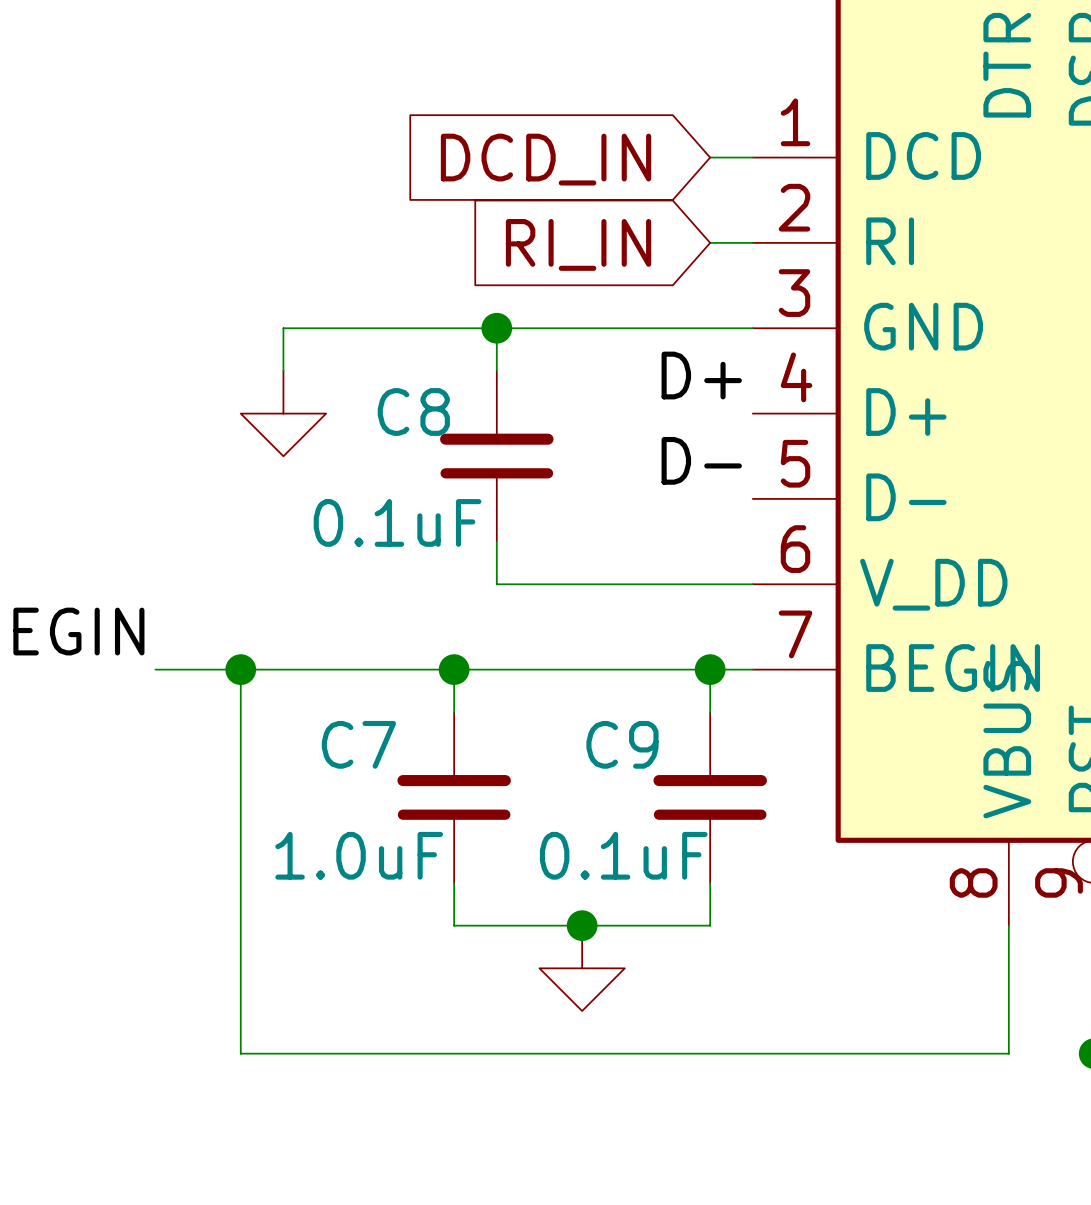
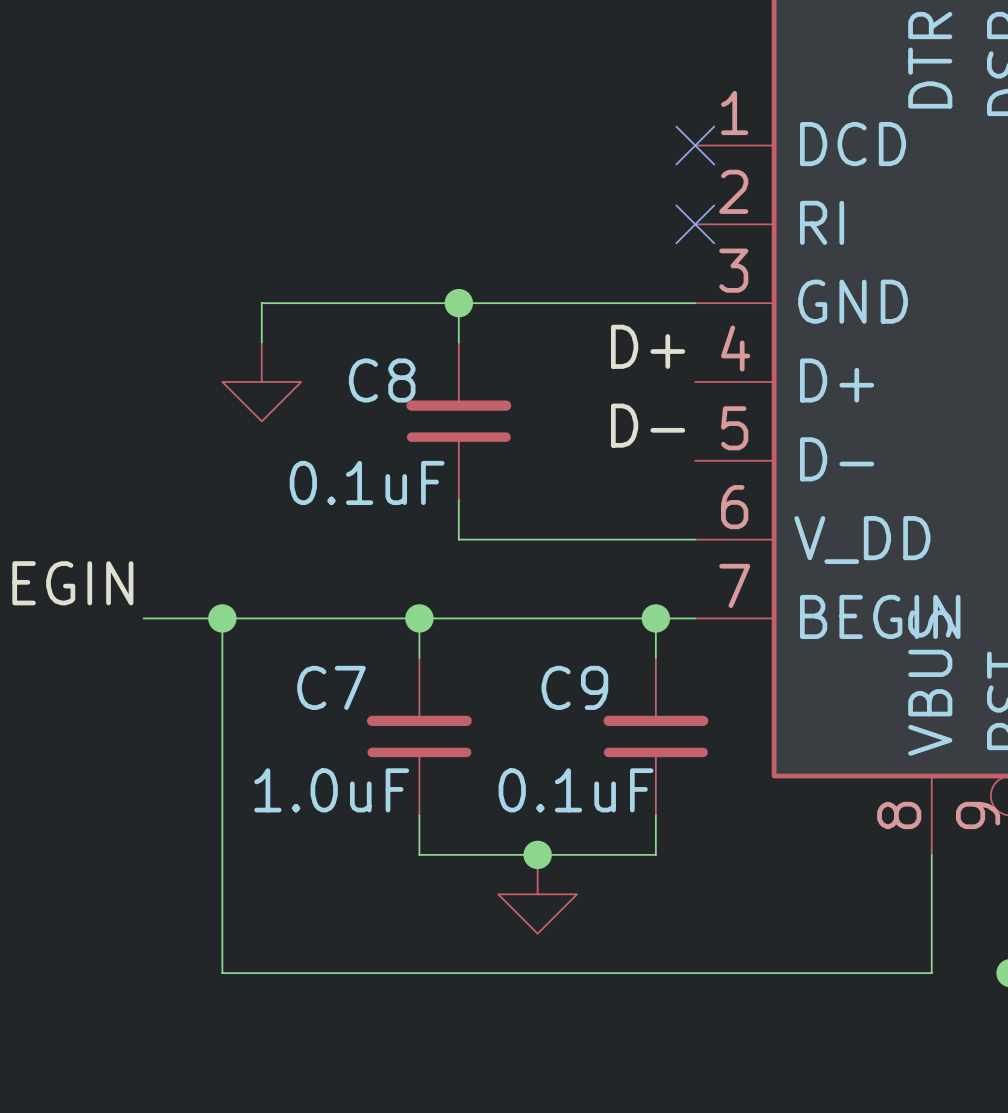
wire: (710, 157) (752, 157) -> none
no-connect mark: none -> (695, 145)
global label: DCD_IN (546, 159) -> none
wire: (710, 242) (752, 242) -> none
no-connect mark: none -> (695, 224)
global label: RI_IN (578, 244) -> none

